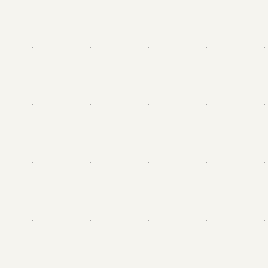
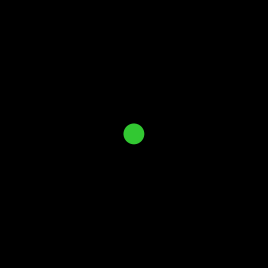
junction: none -> (133, 133)

